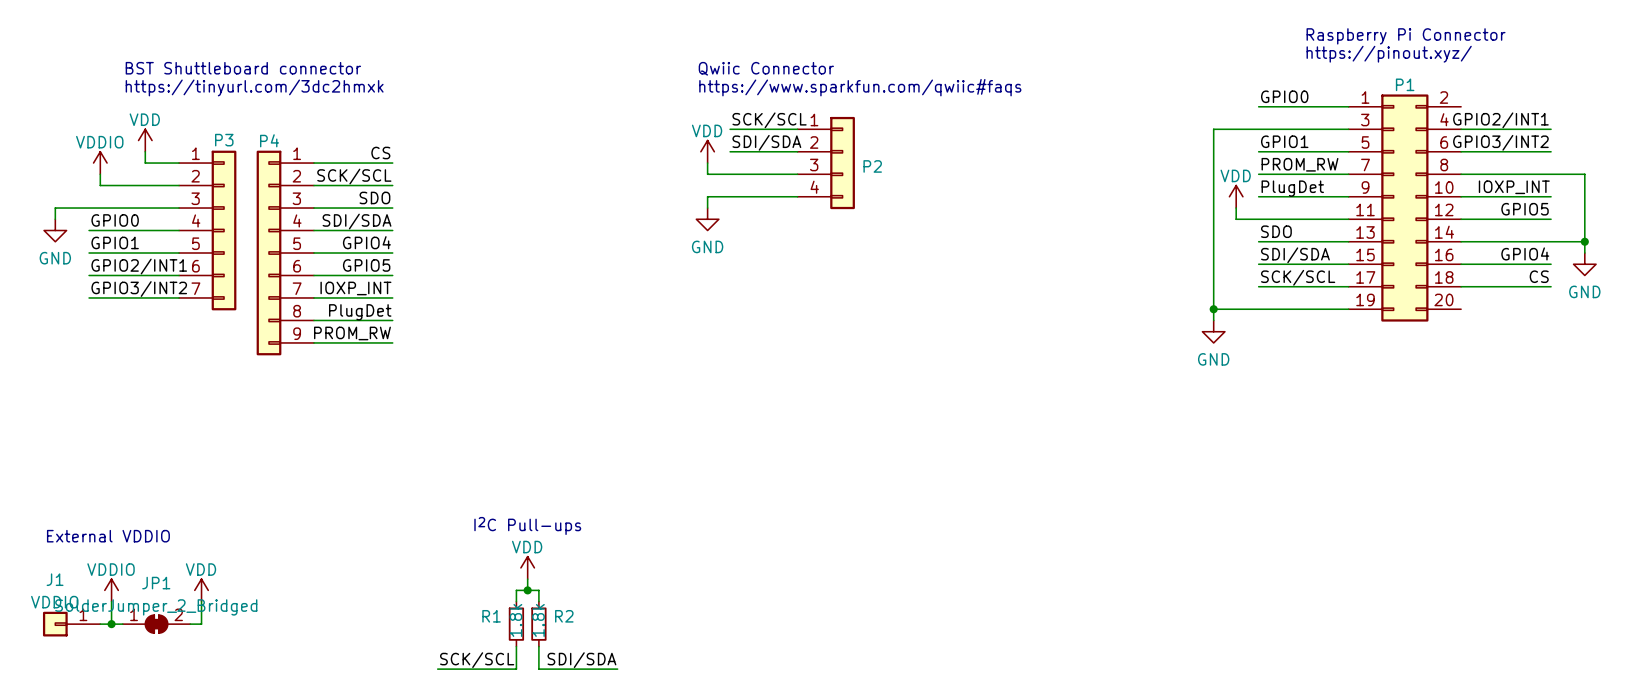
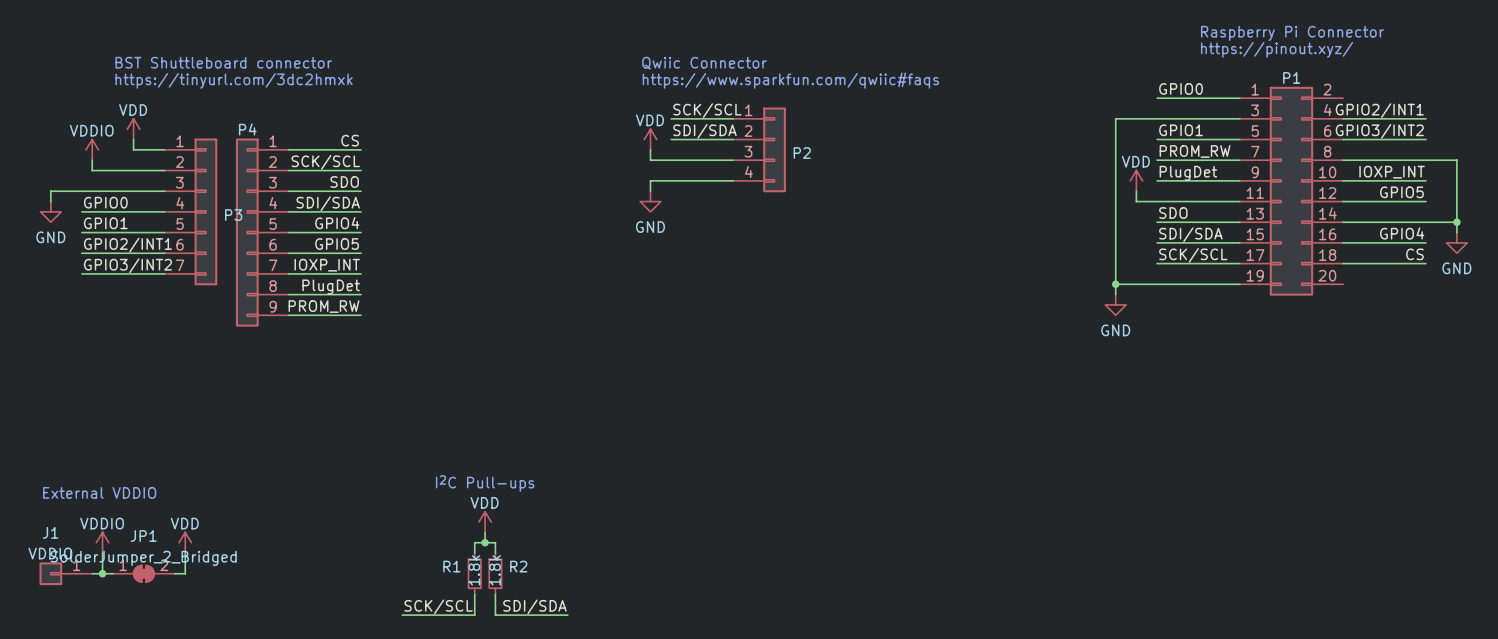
P3 name position: P3 (224, 140) -> P3 (233, 215)

